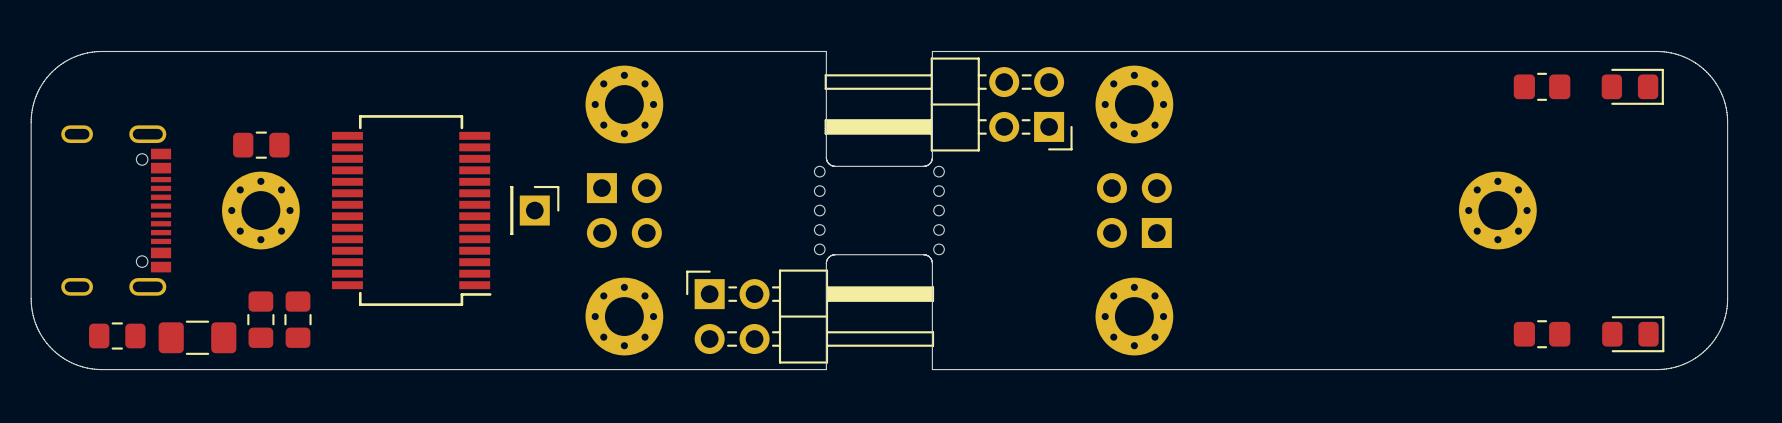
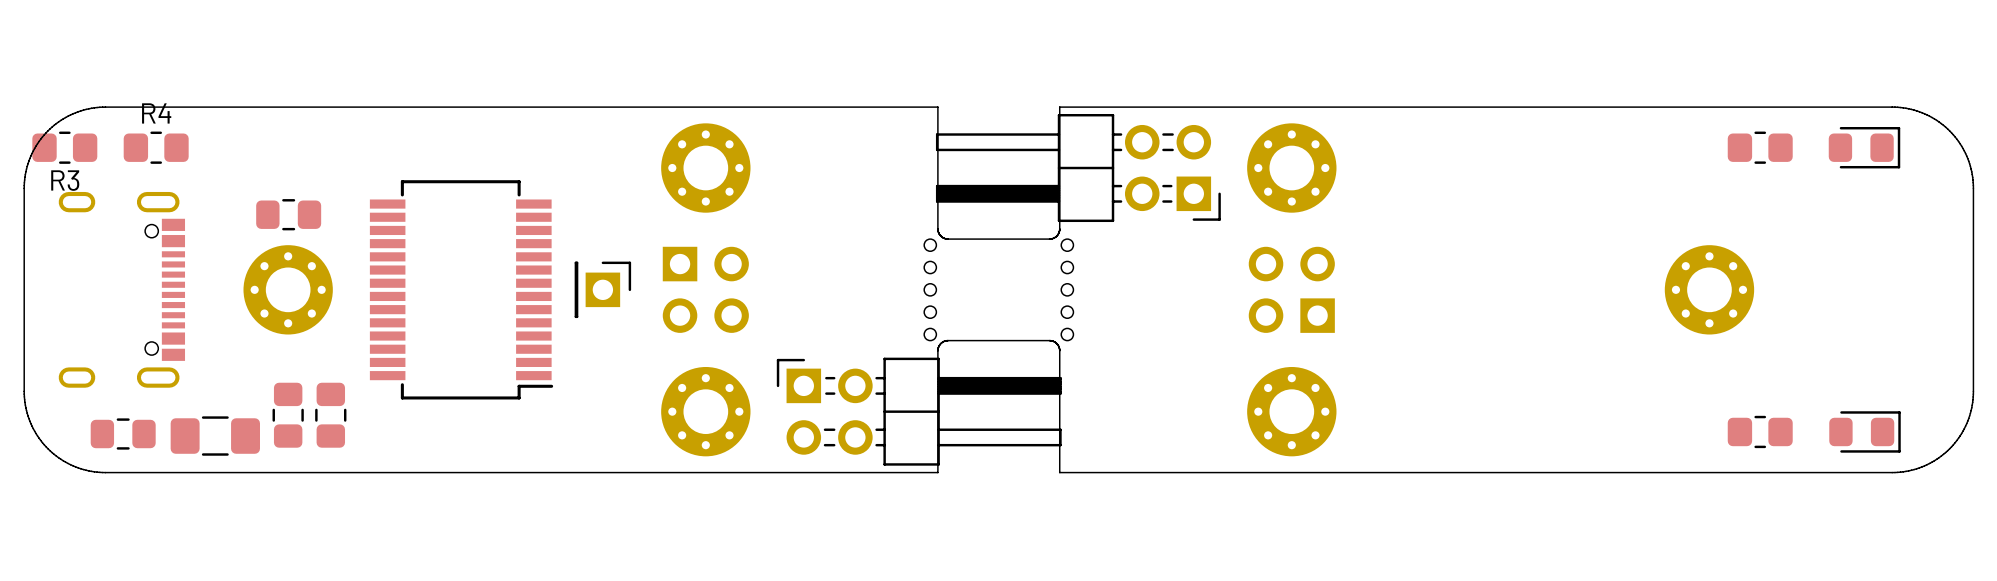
R3: none -> (64, 147)
R4: none -> (156, 147)

